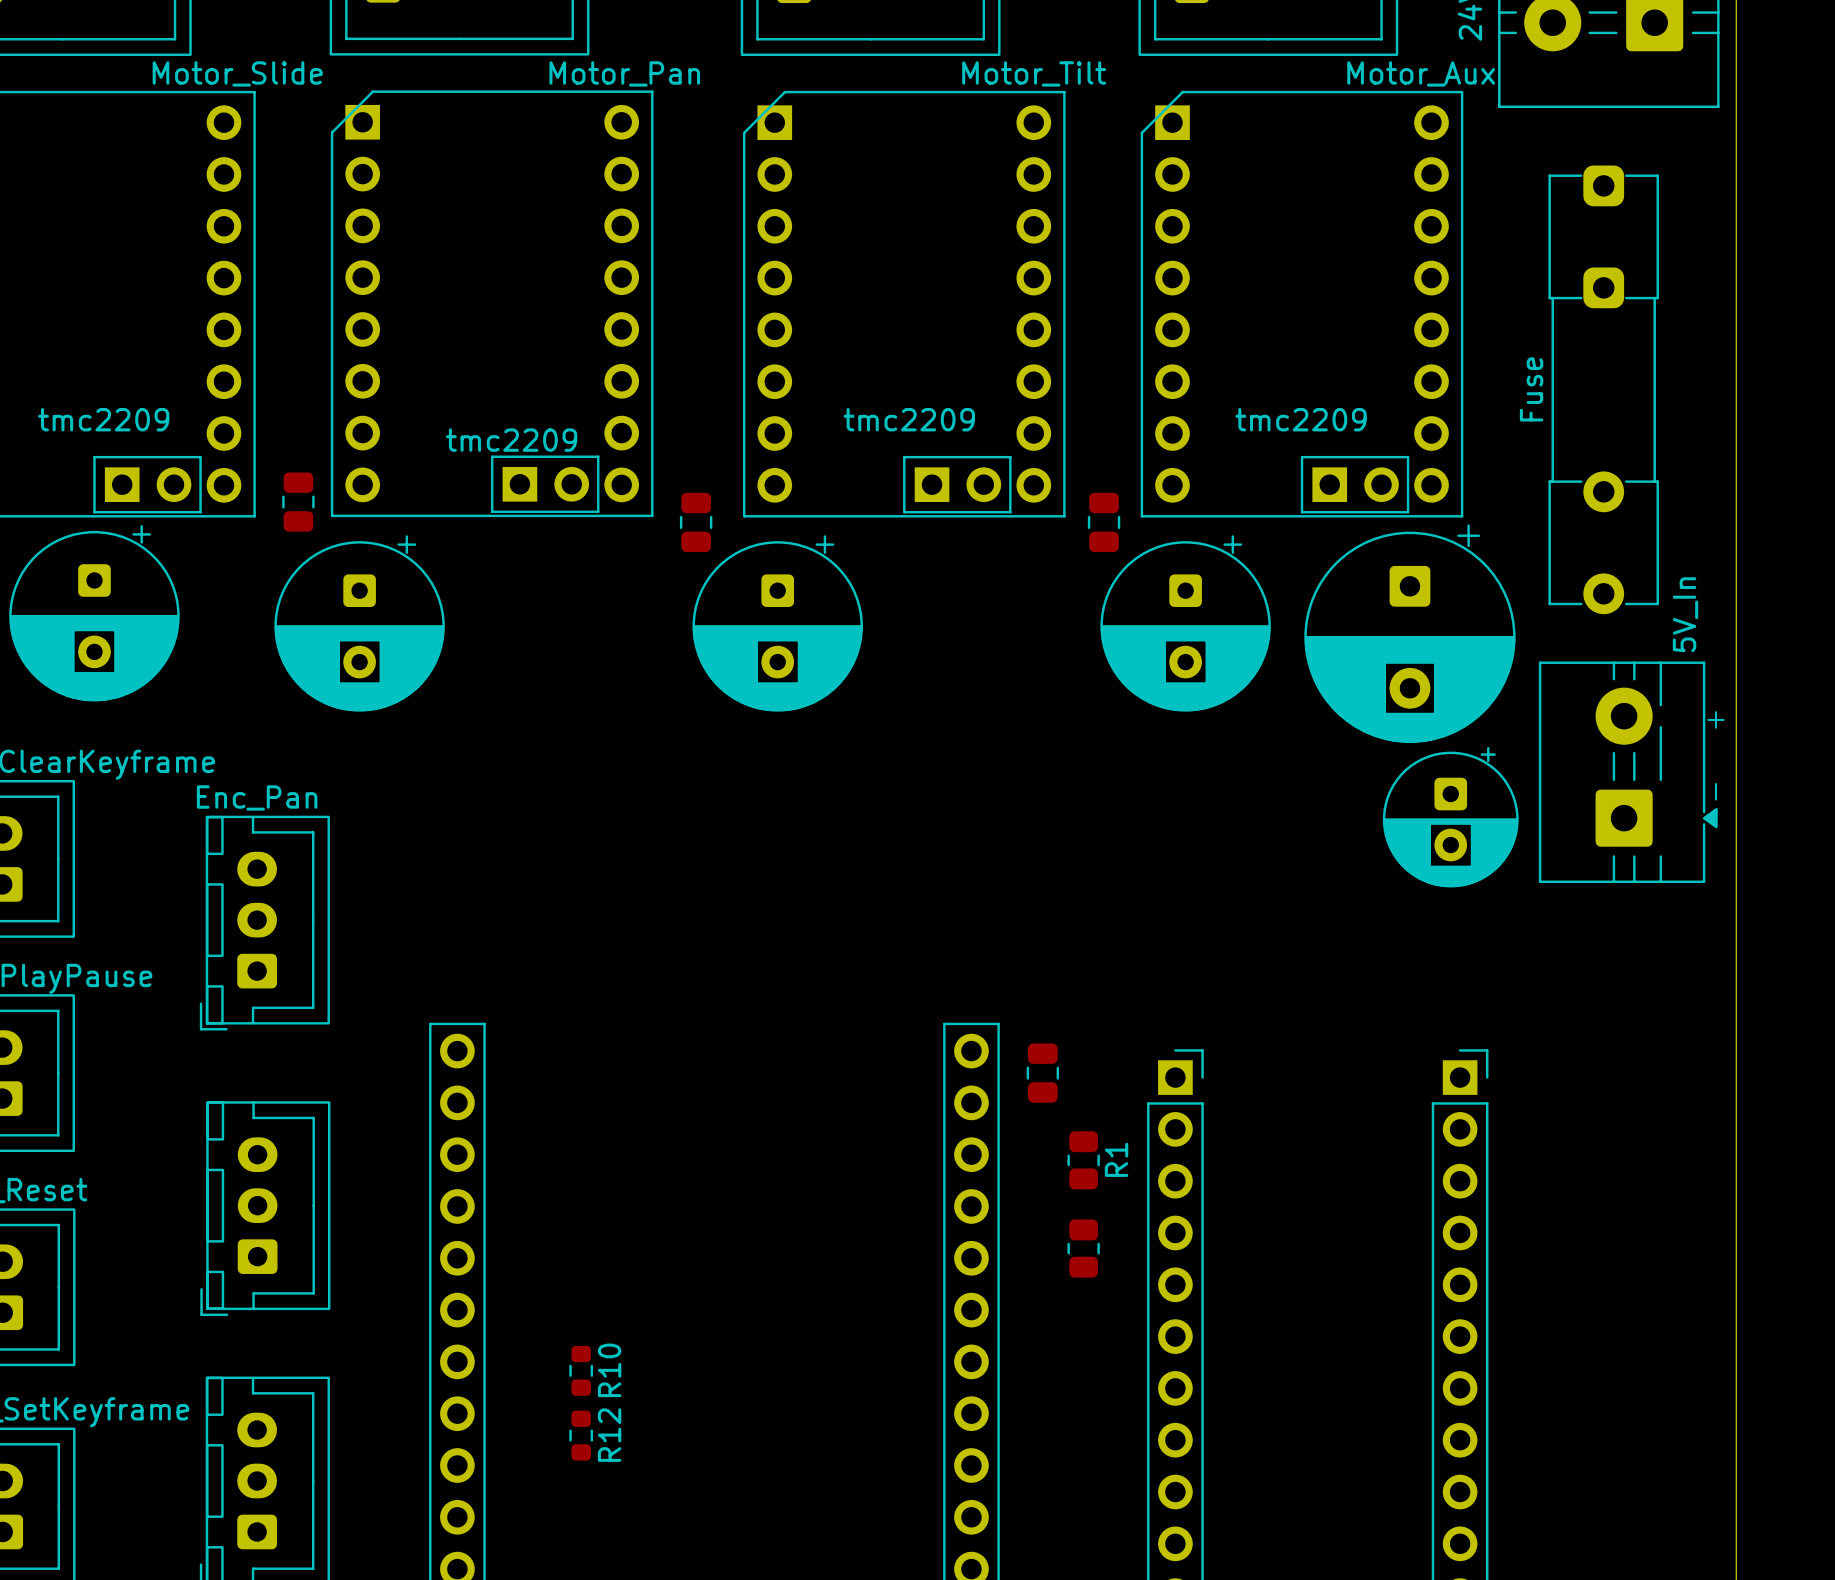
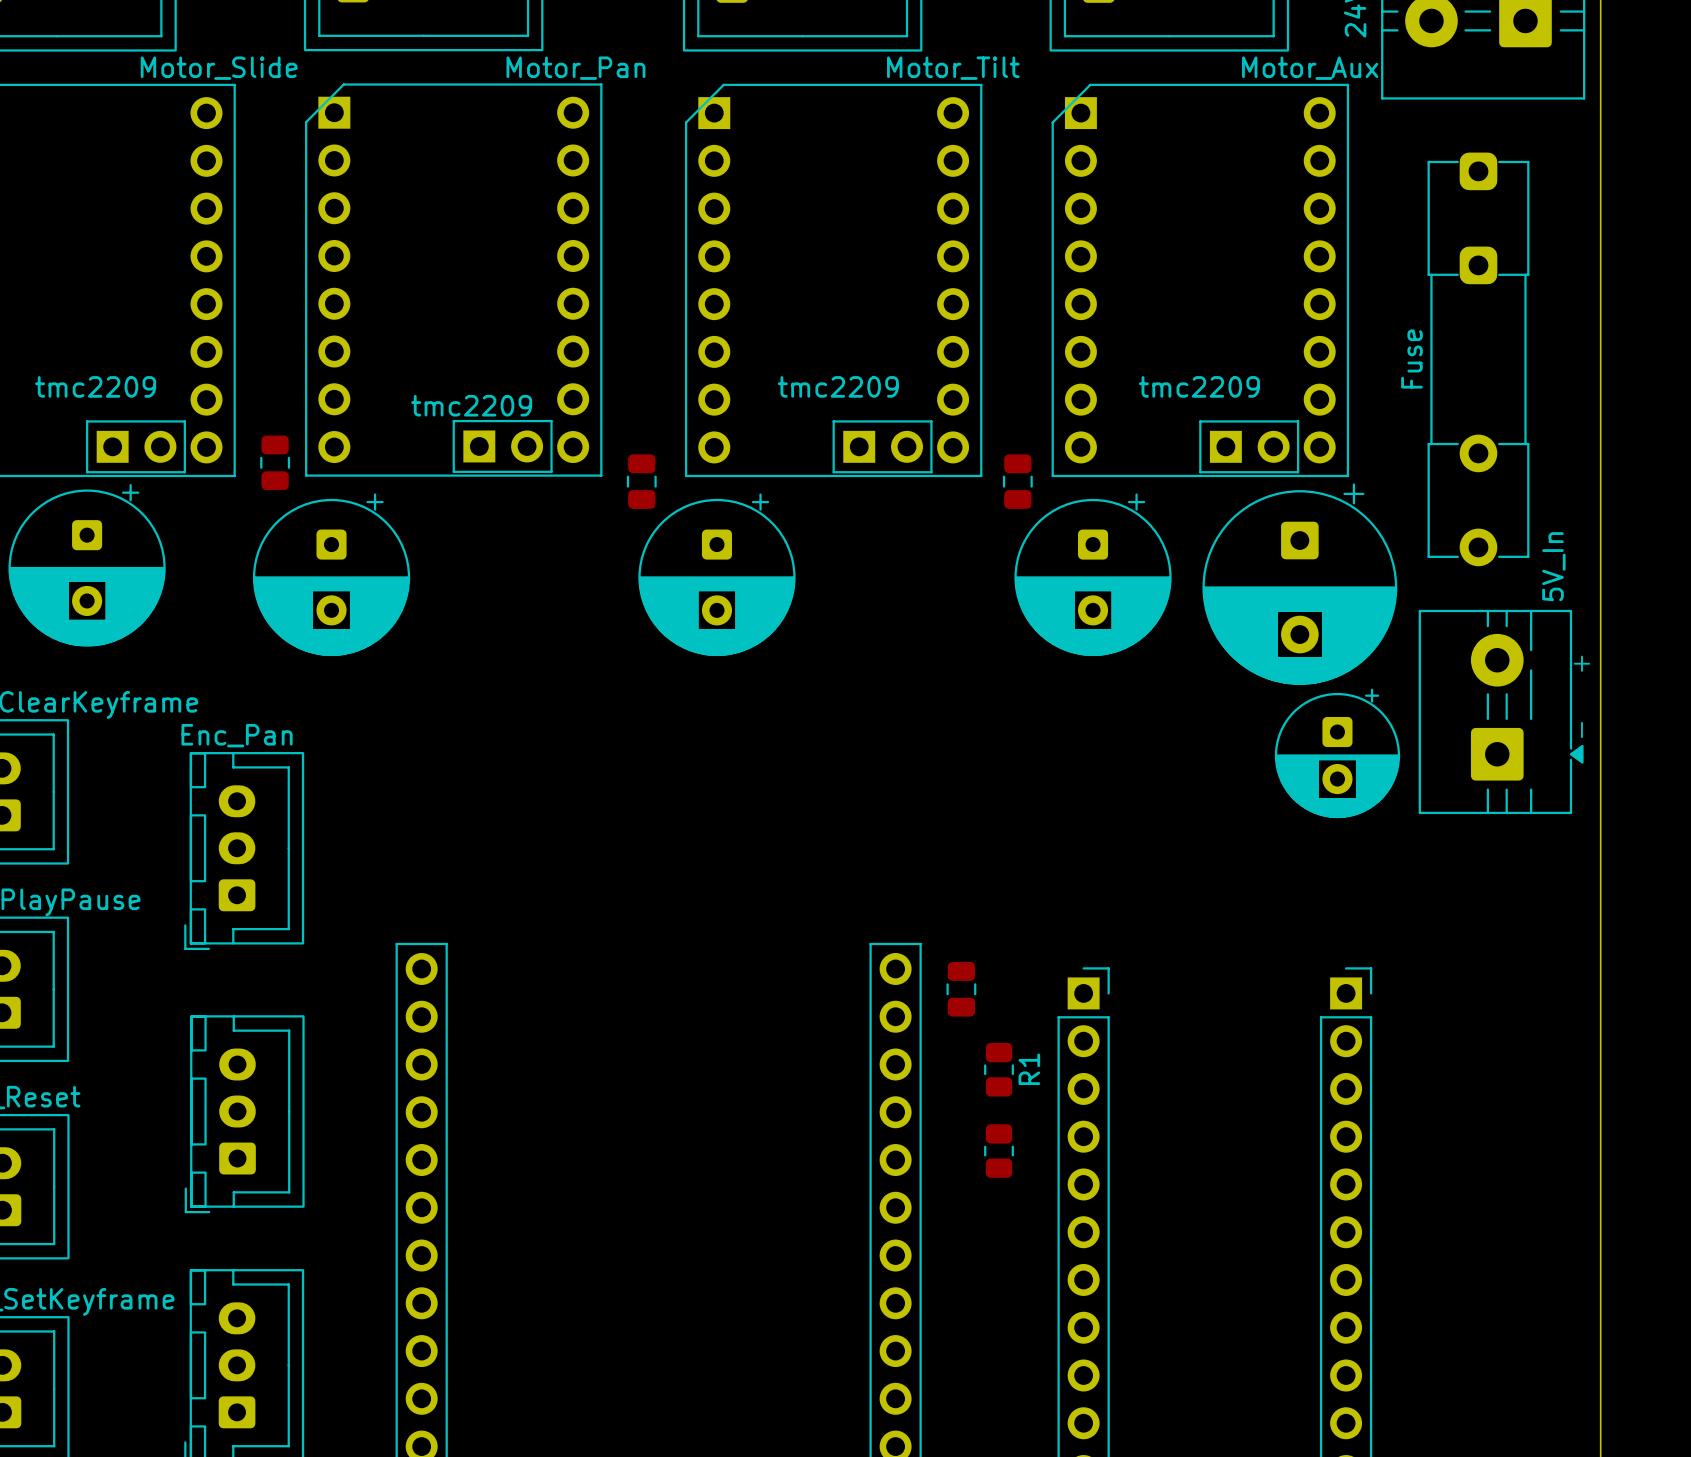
R10: (581, 1370) -> none
R12: (581, 1435) -> none

